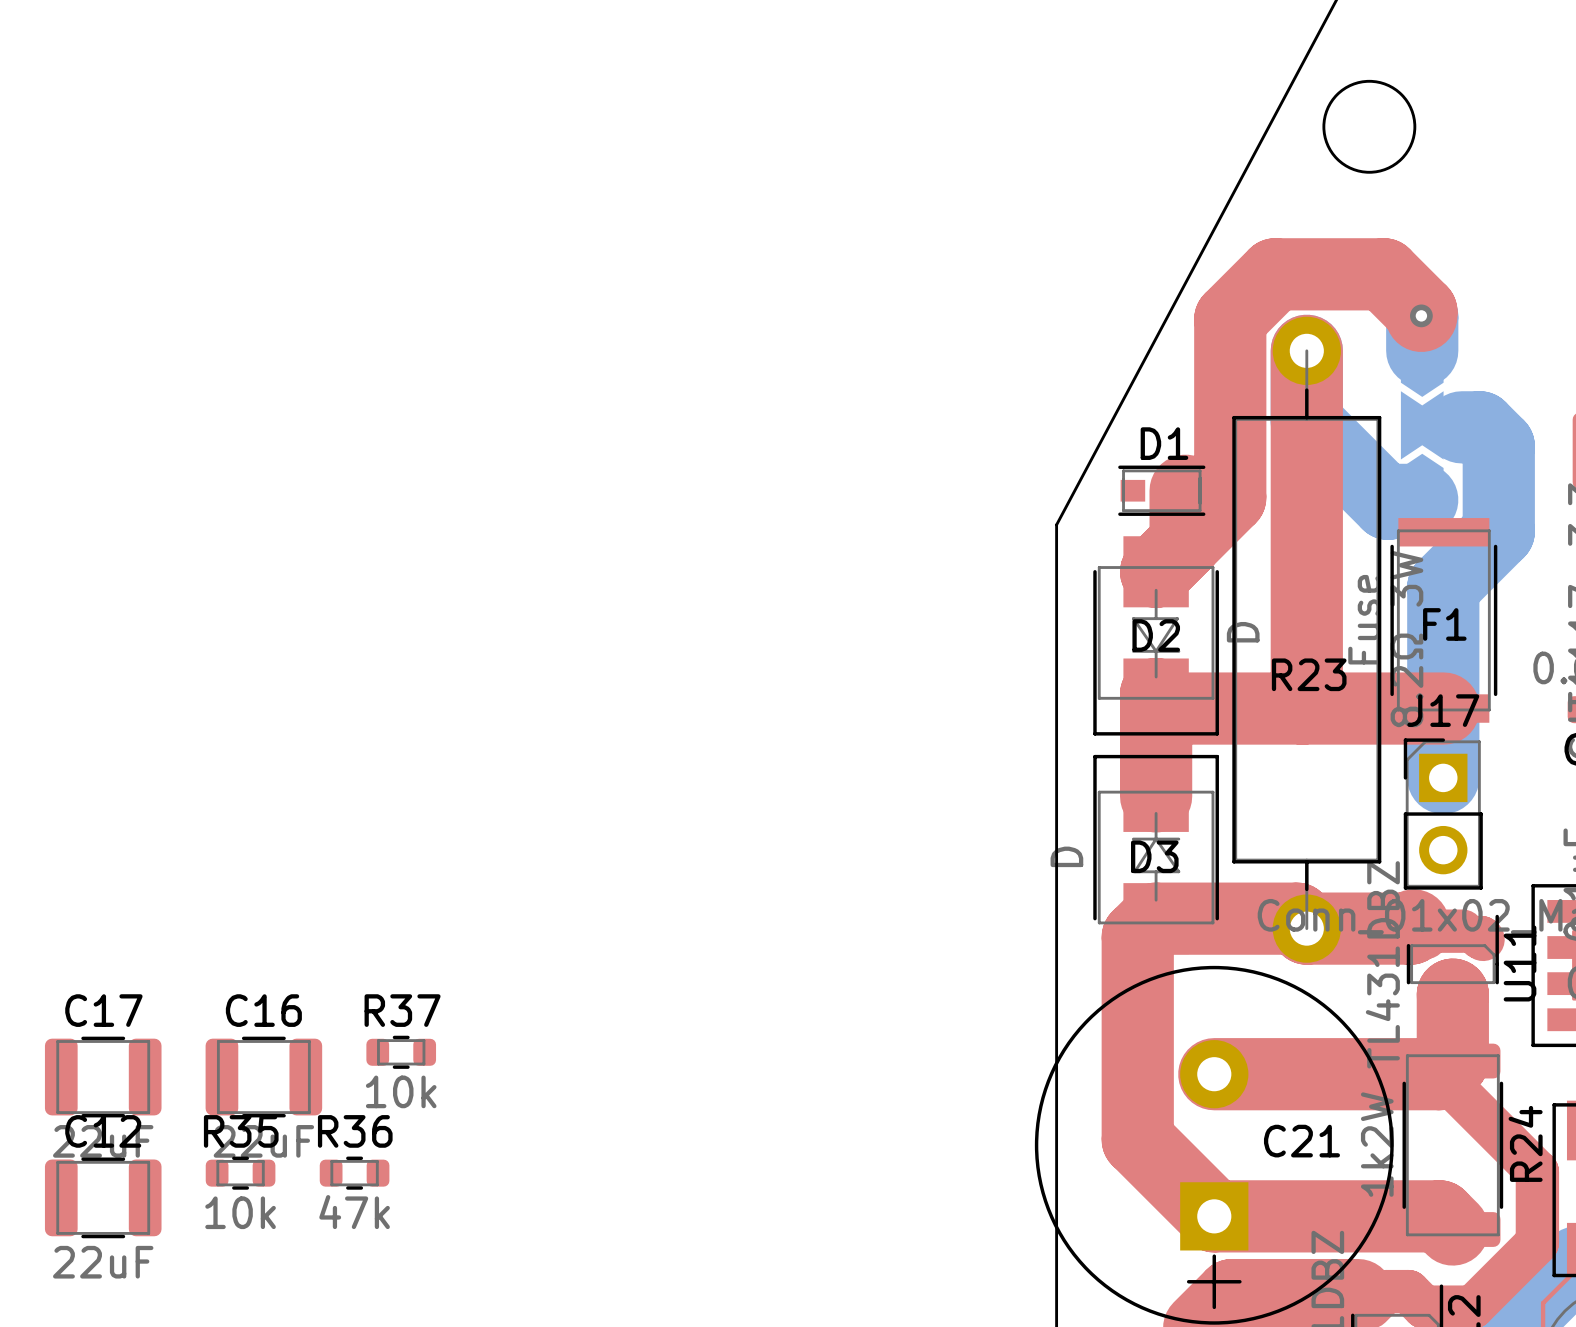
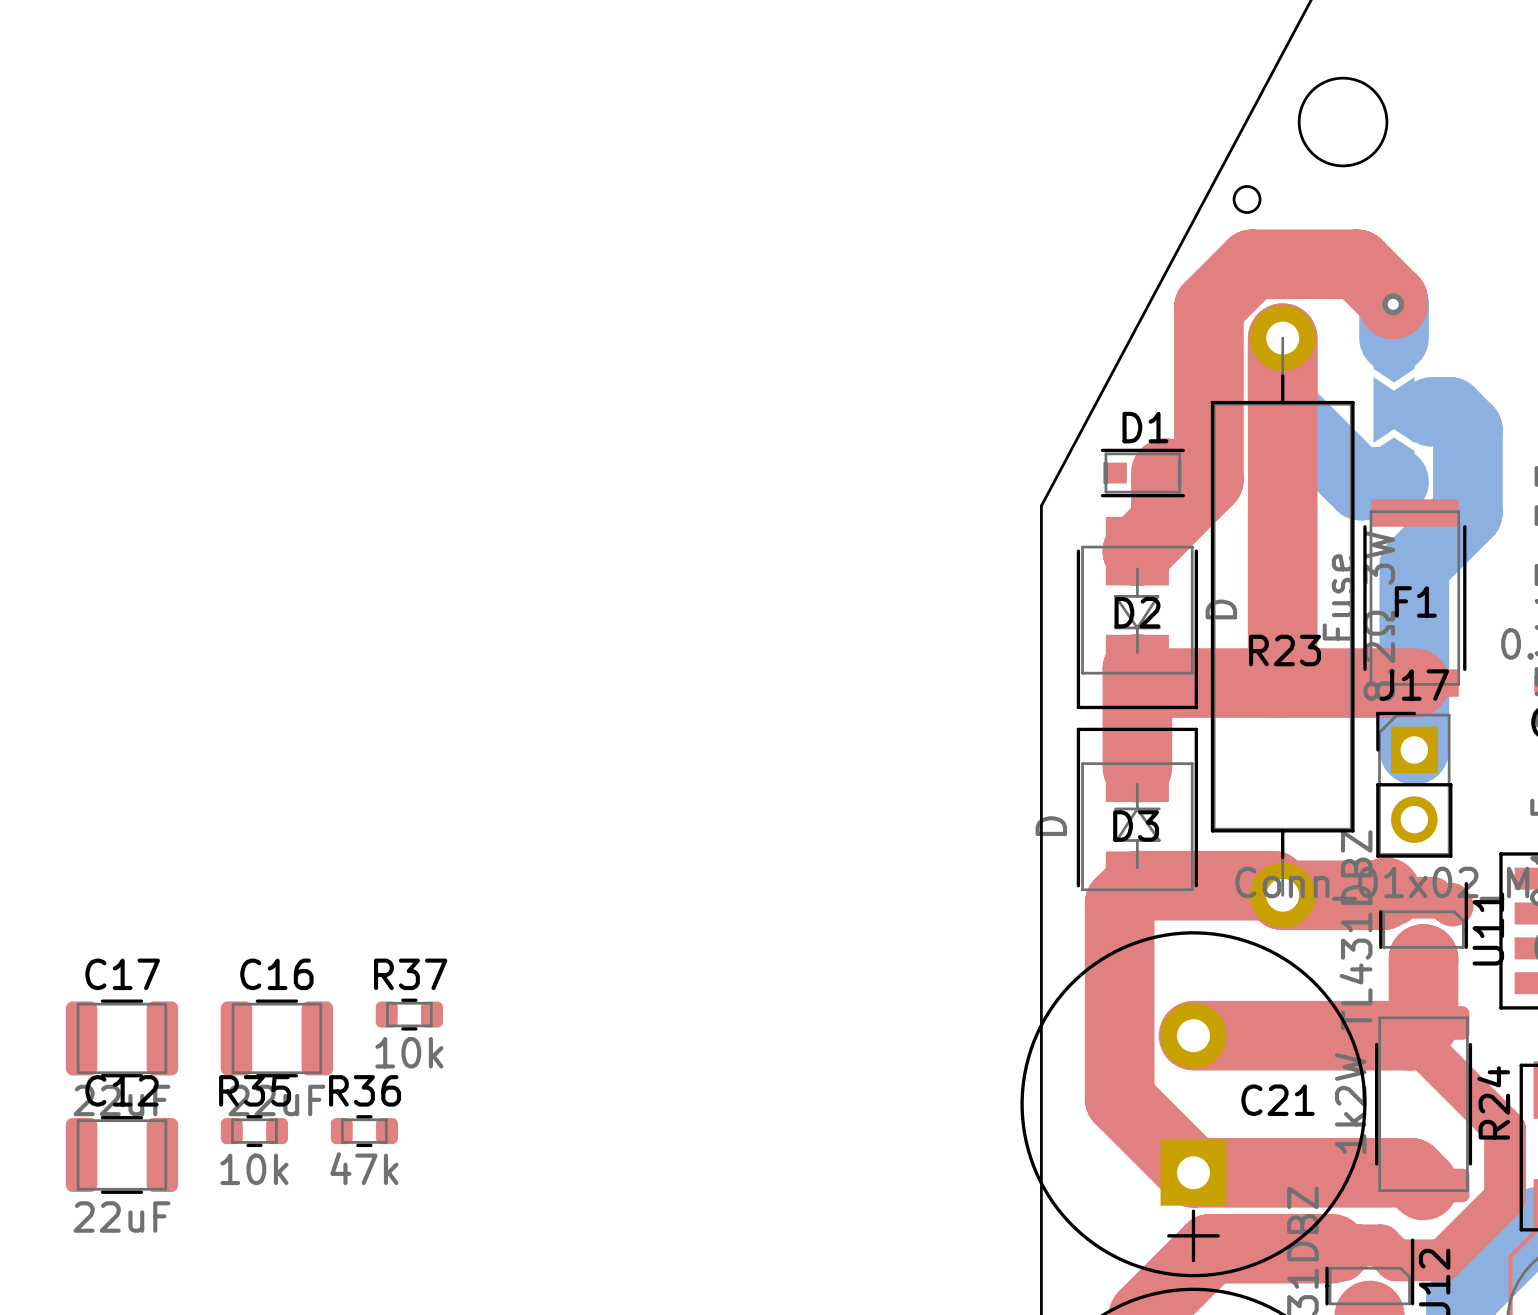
round board edge: none -> [1232, 185, 1262, 214]

